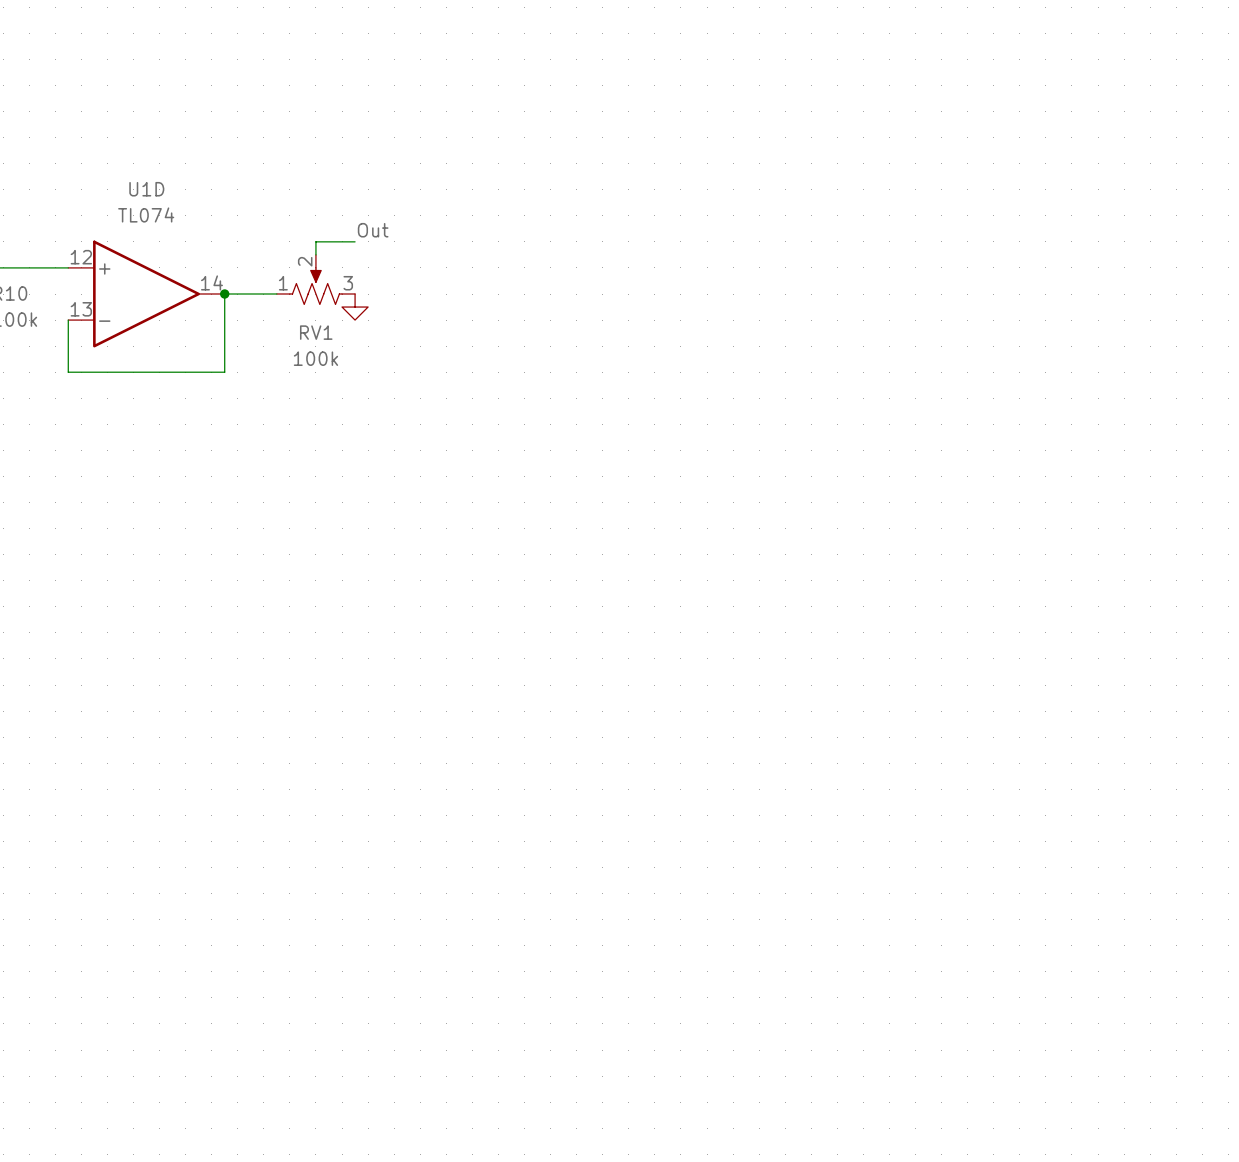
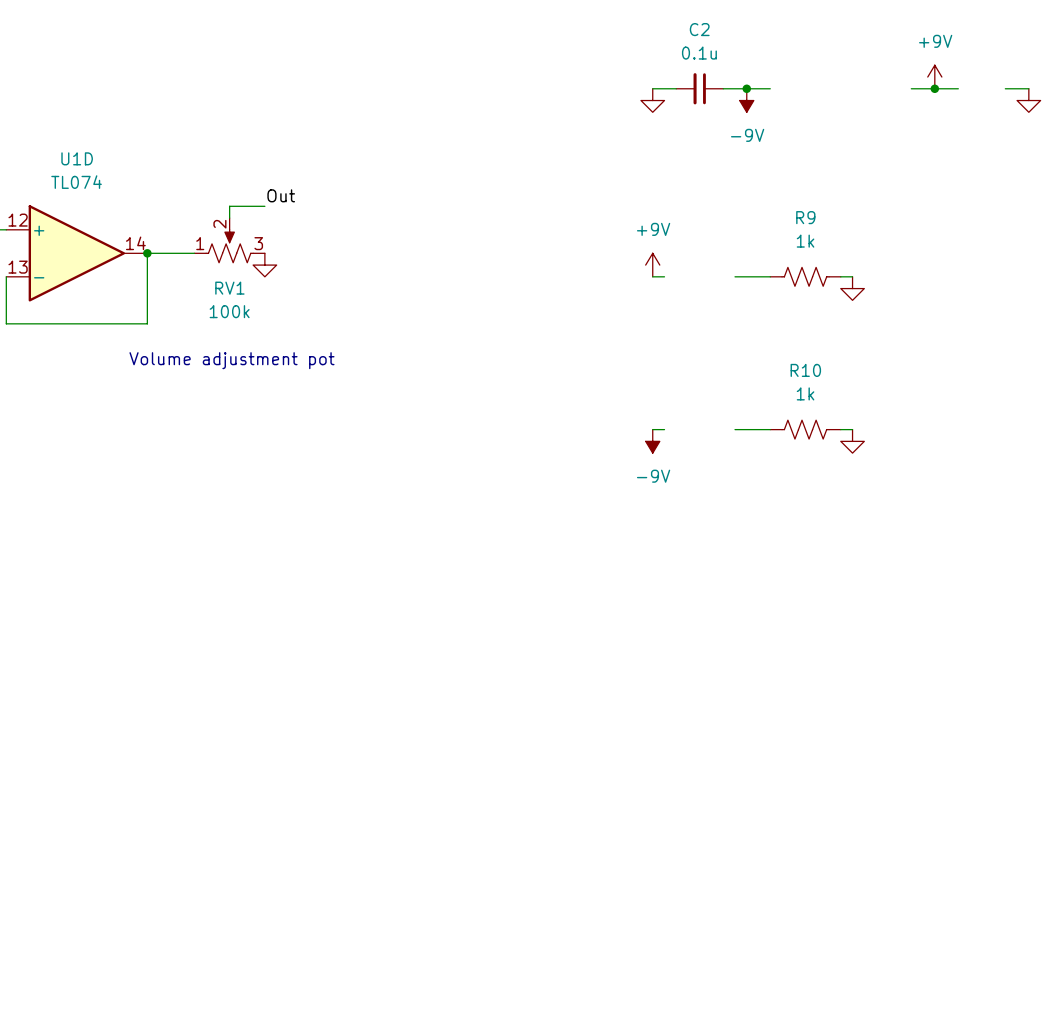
power symbol: none -> +9V (934, 77)
wire: none -> (652, 88) (676, 88)
C2: none -> 0.1u (699, 88)
wire: none -> (723, 88) (770, 88)
junction: none -> (746, 88)
wire: none -> (911, 88) (958, 88)
junction: none -> (934, 88)
wire: none -> (1005, 88) (1028, 88)
power symbol: none -> (652, 100)
power symbol: none -> -9V (746, 100)
power symbol: none -> (1028, 100)
power symbol: none -> +9V (652, 265)
wire: none -> (652, 276) (664, 276)
wire: none -> (735, 276) (770, 276)
R9: none -> 1k (805, 276)
wire: none -> (840, 276) (852, 276)
power symbol: none -> (852, 288)
text: none -> Volume adjustment pot (231, 360)
wire: none -> (652, 429) (664, 429)
wire: none -> (735, 429) (770, 429)
R10: none -> 1k (805, 429)
wire: none -> (840, 429) (852, 429)
power symbol: none -> -9V (652, 441)
power symbol: none -> (852, 441)

